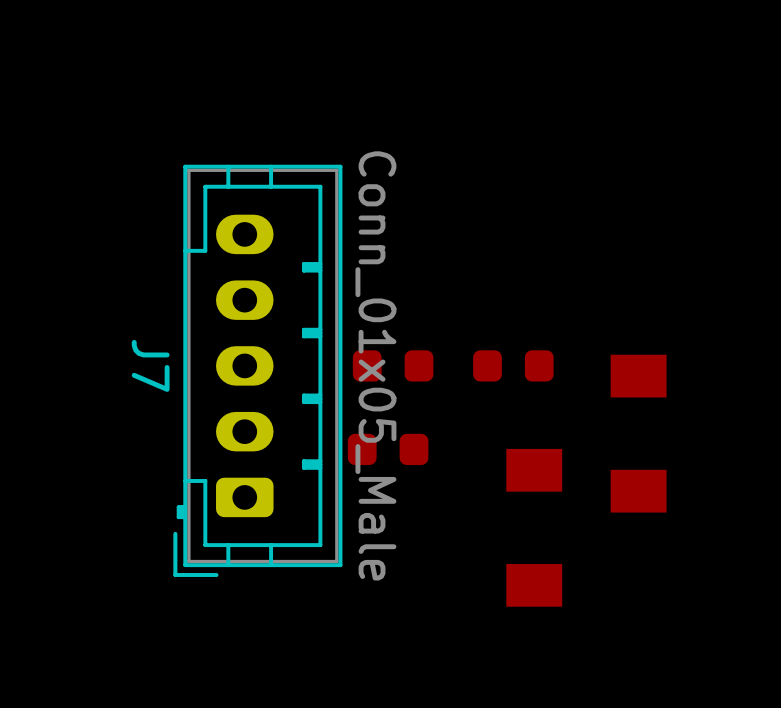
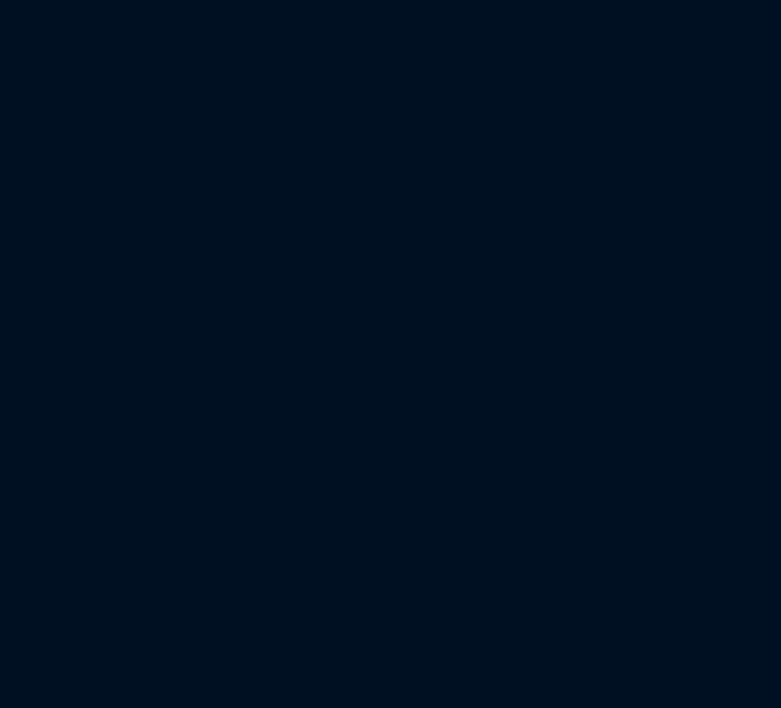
part: (393, 365) -> none
part: (513, 365) -> none
J7: Conn_01x05_Male (257, 370) -> none
part: (638, 433) -> none
part: (388, 449) -> none
part: (534, 527) -> none

